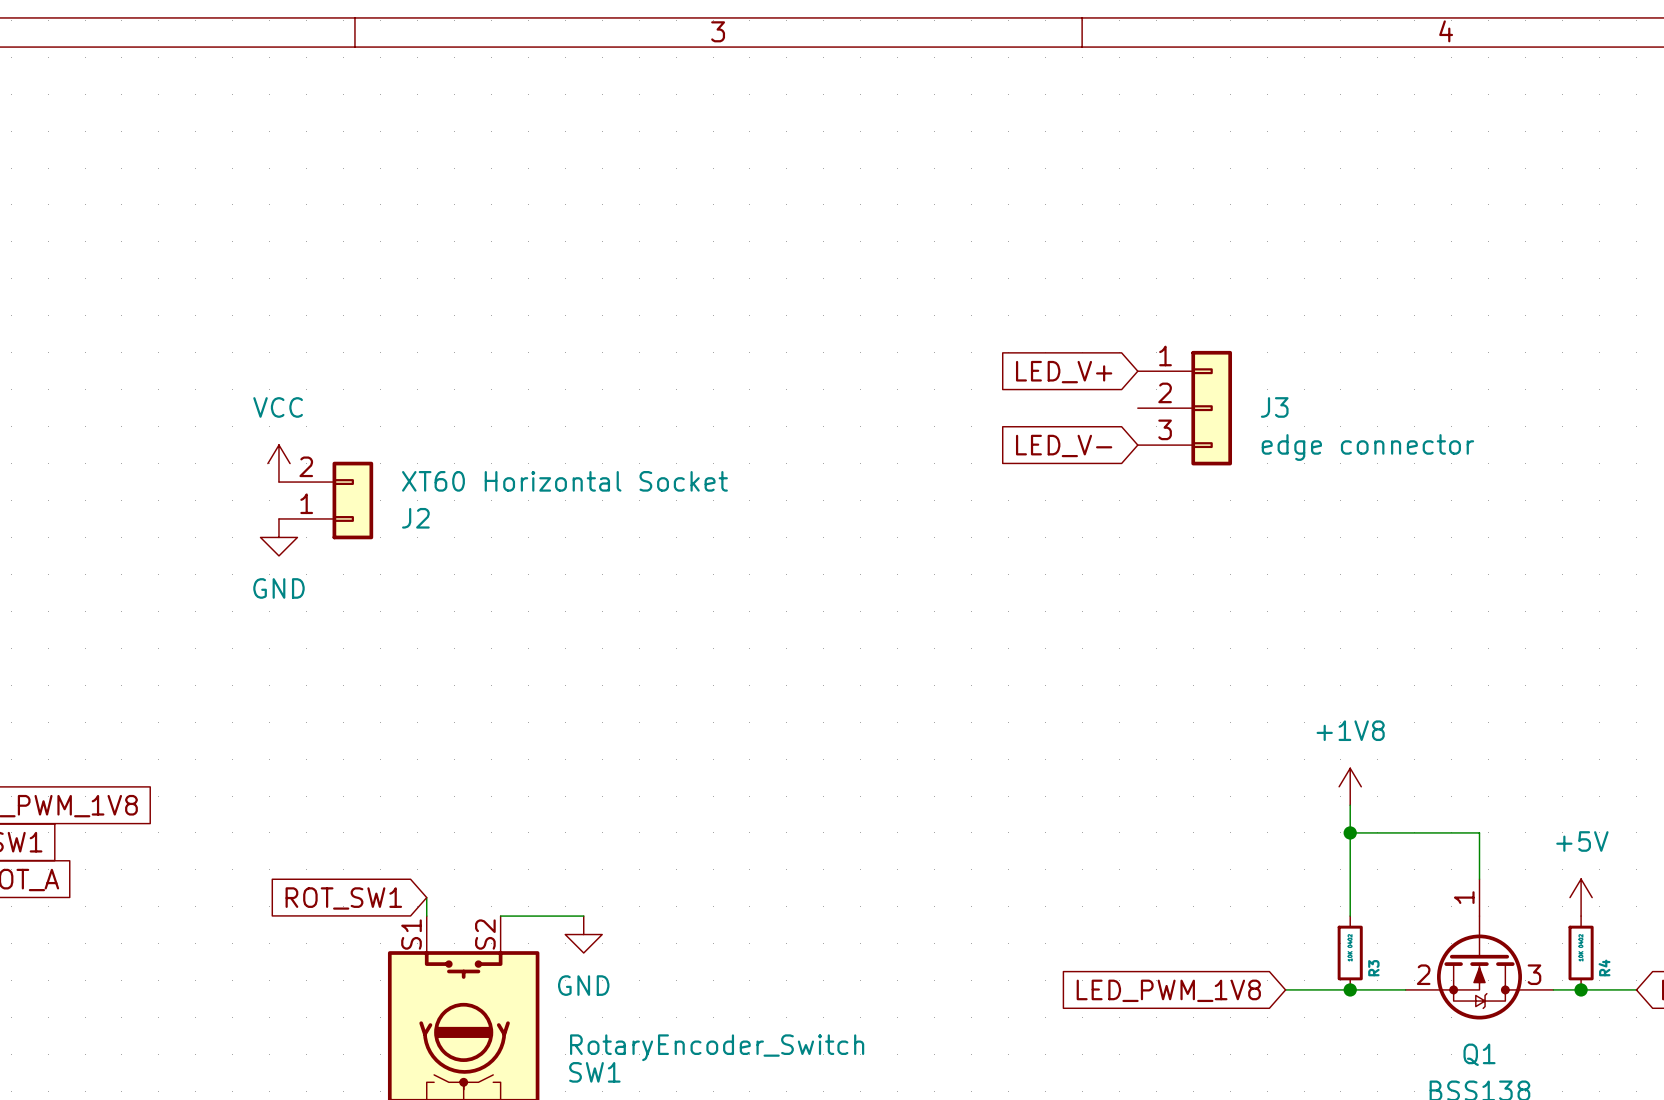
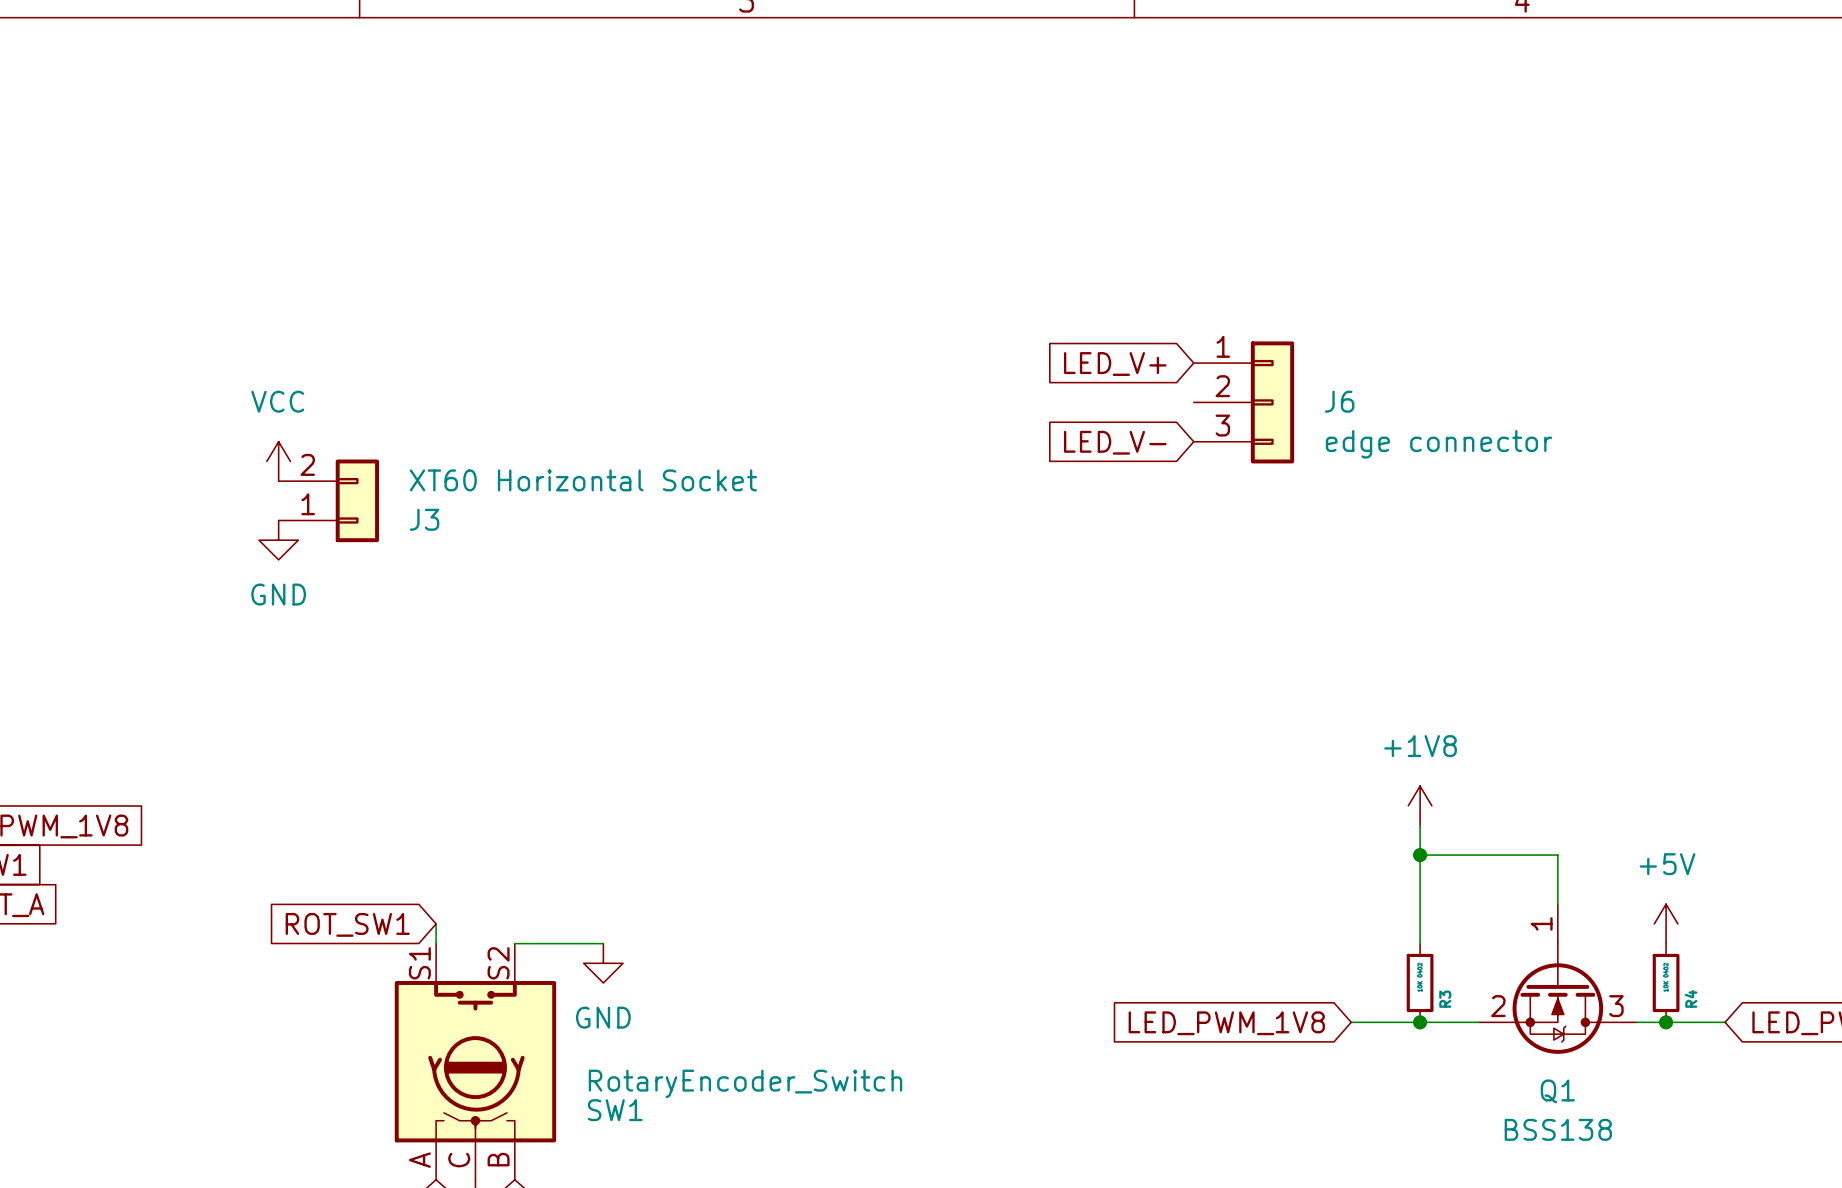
J3 name: J3 (1274, 407) -> J6 (1339, 401)
J2 name: J2 (415, 518) -> J3 (424, 519)

